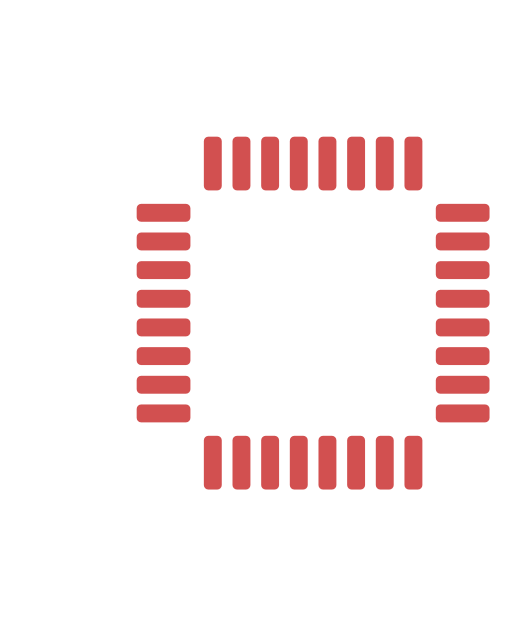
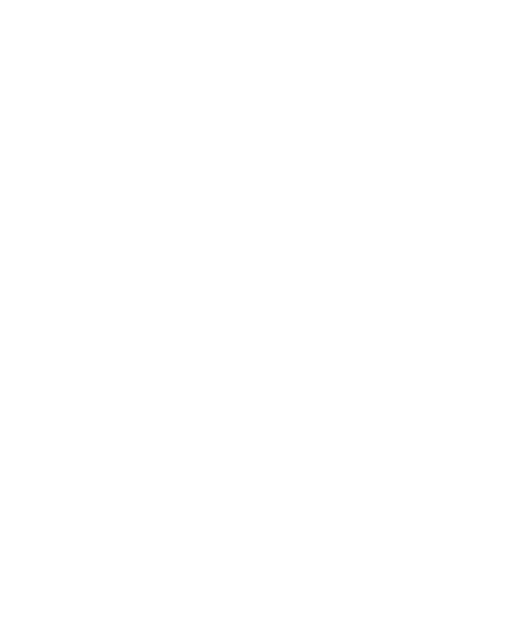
part: (313, 313) -> none

